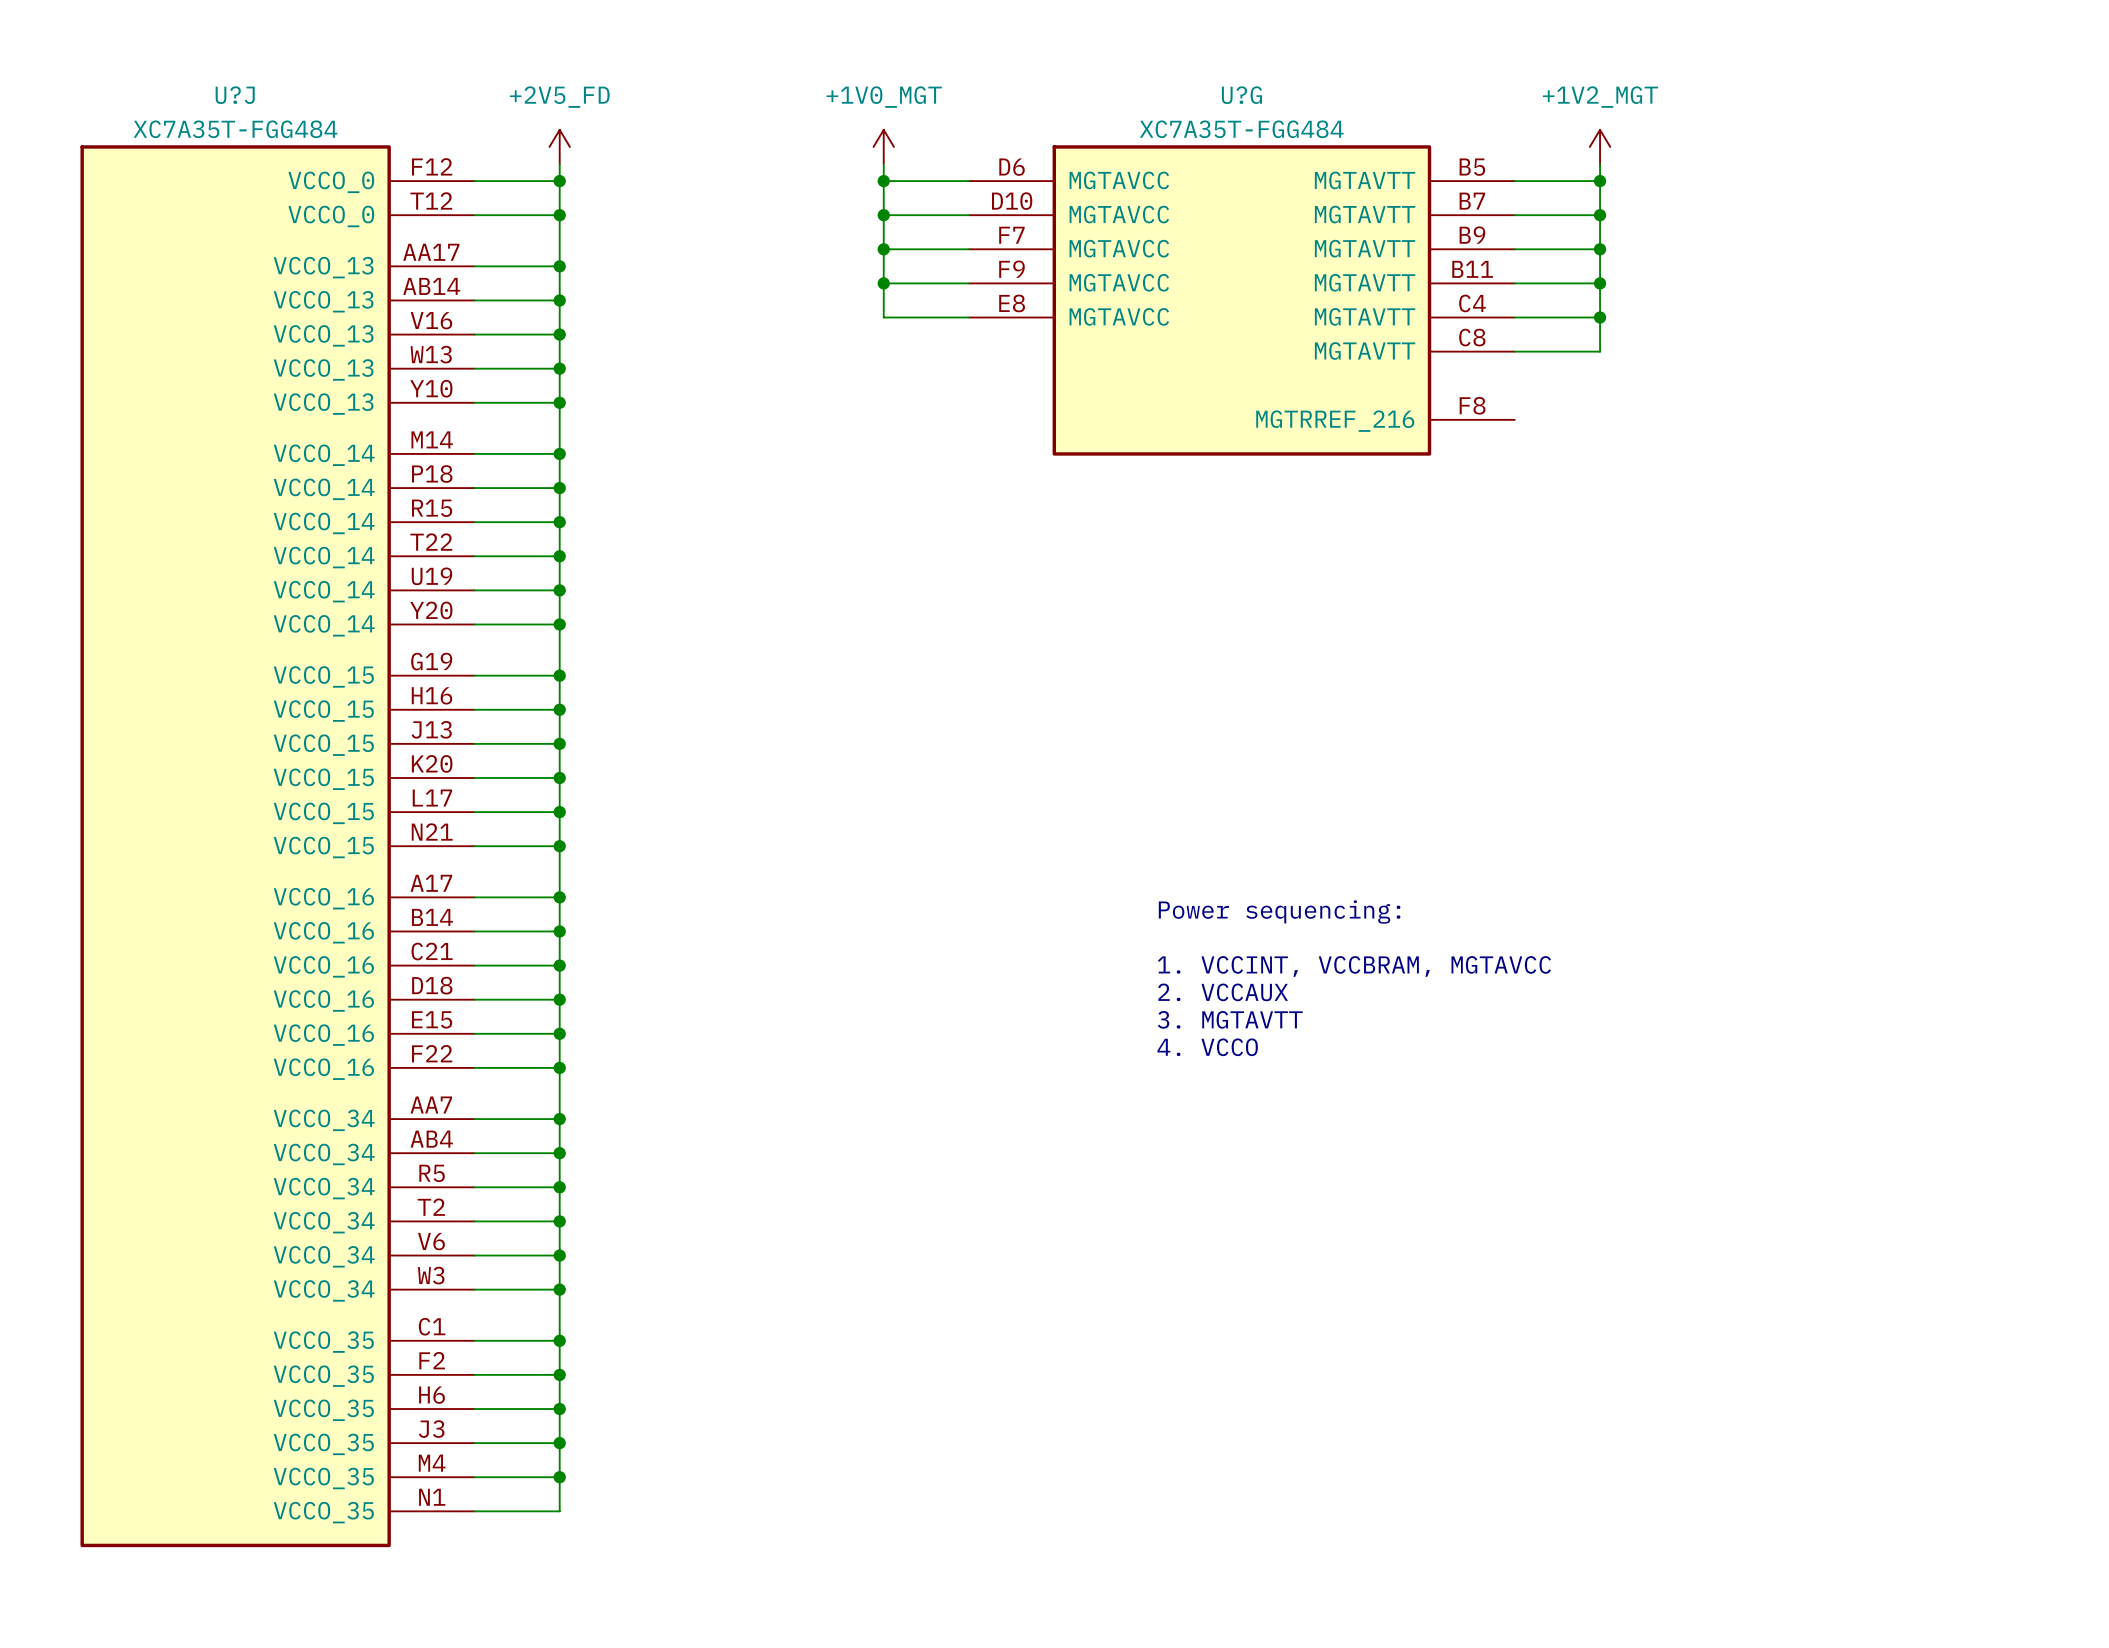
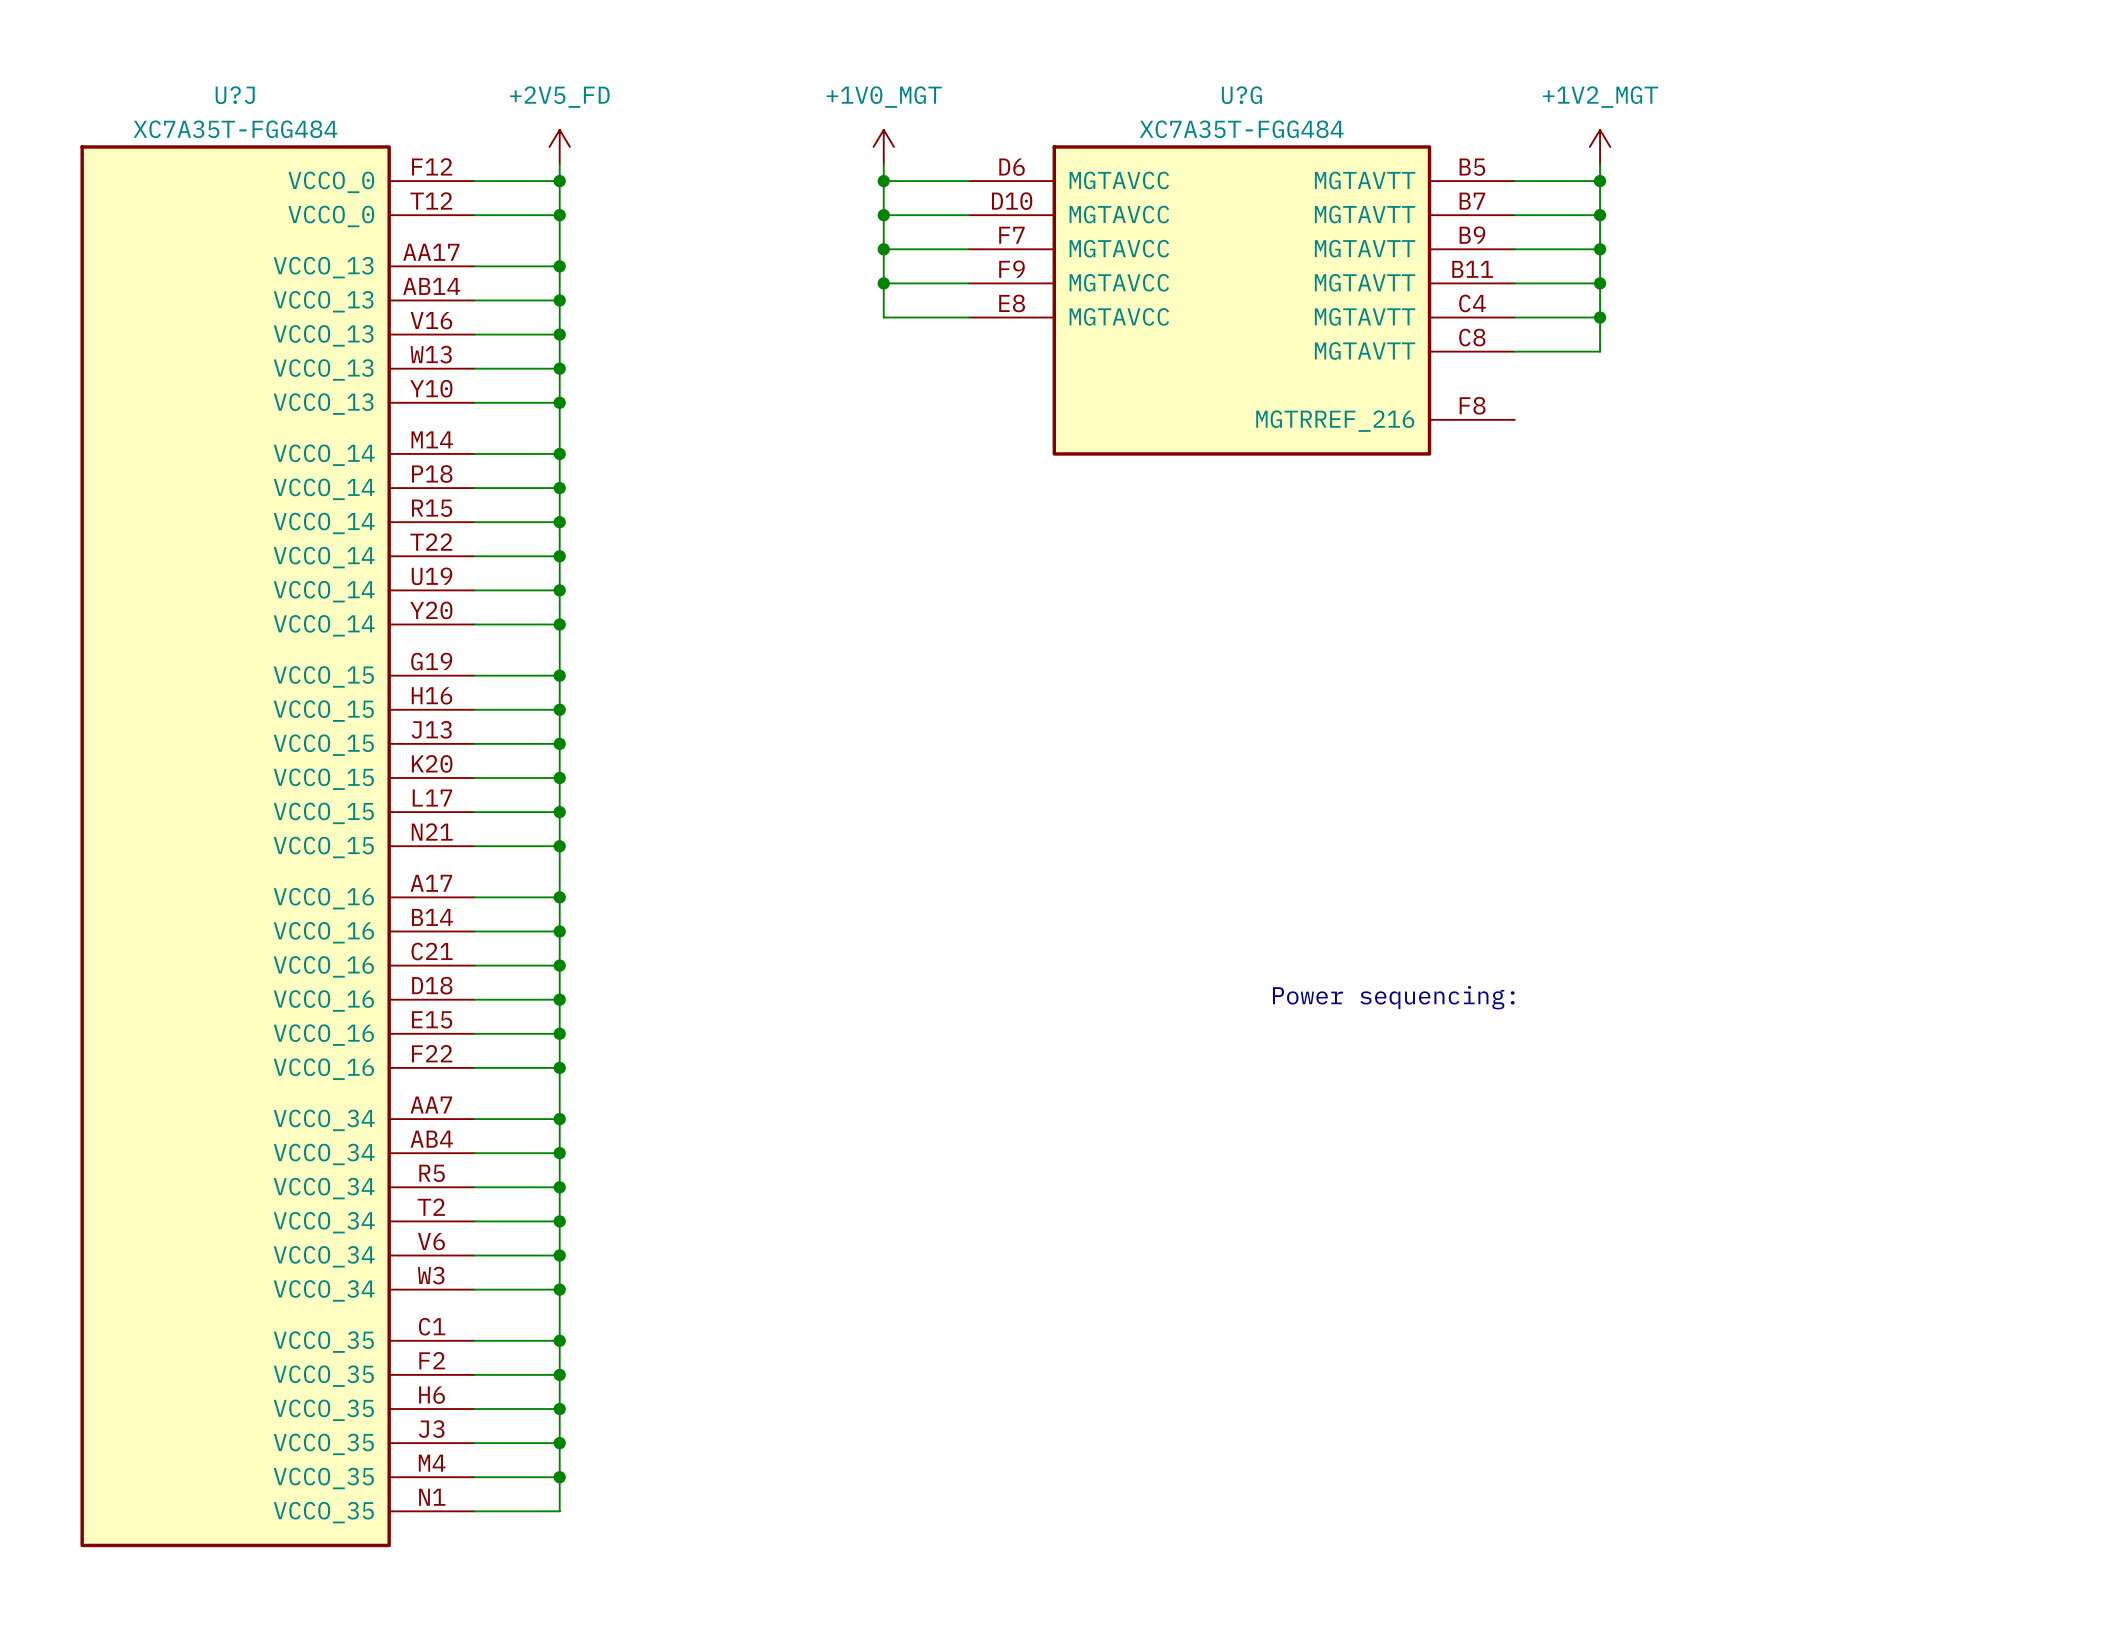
text position: Power sequencing: (1279, 911) -> Power sequencing: (1393, 997)
text: 1. VCCINT, VCCBRAM, MGTAVCC (1354, 966) -> none
text: 2. VCCAUX (1223, 992) -> none
text: 3. MGTAVTT (1230, 1019) -> none
text: 4. VCCO (1207, 1047) -> none

